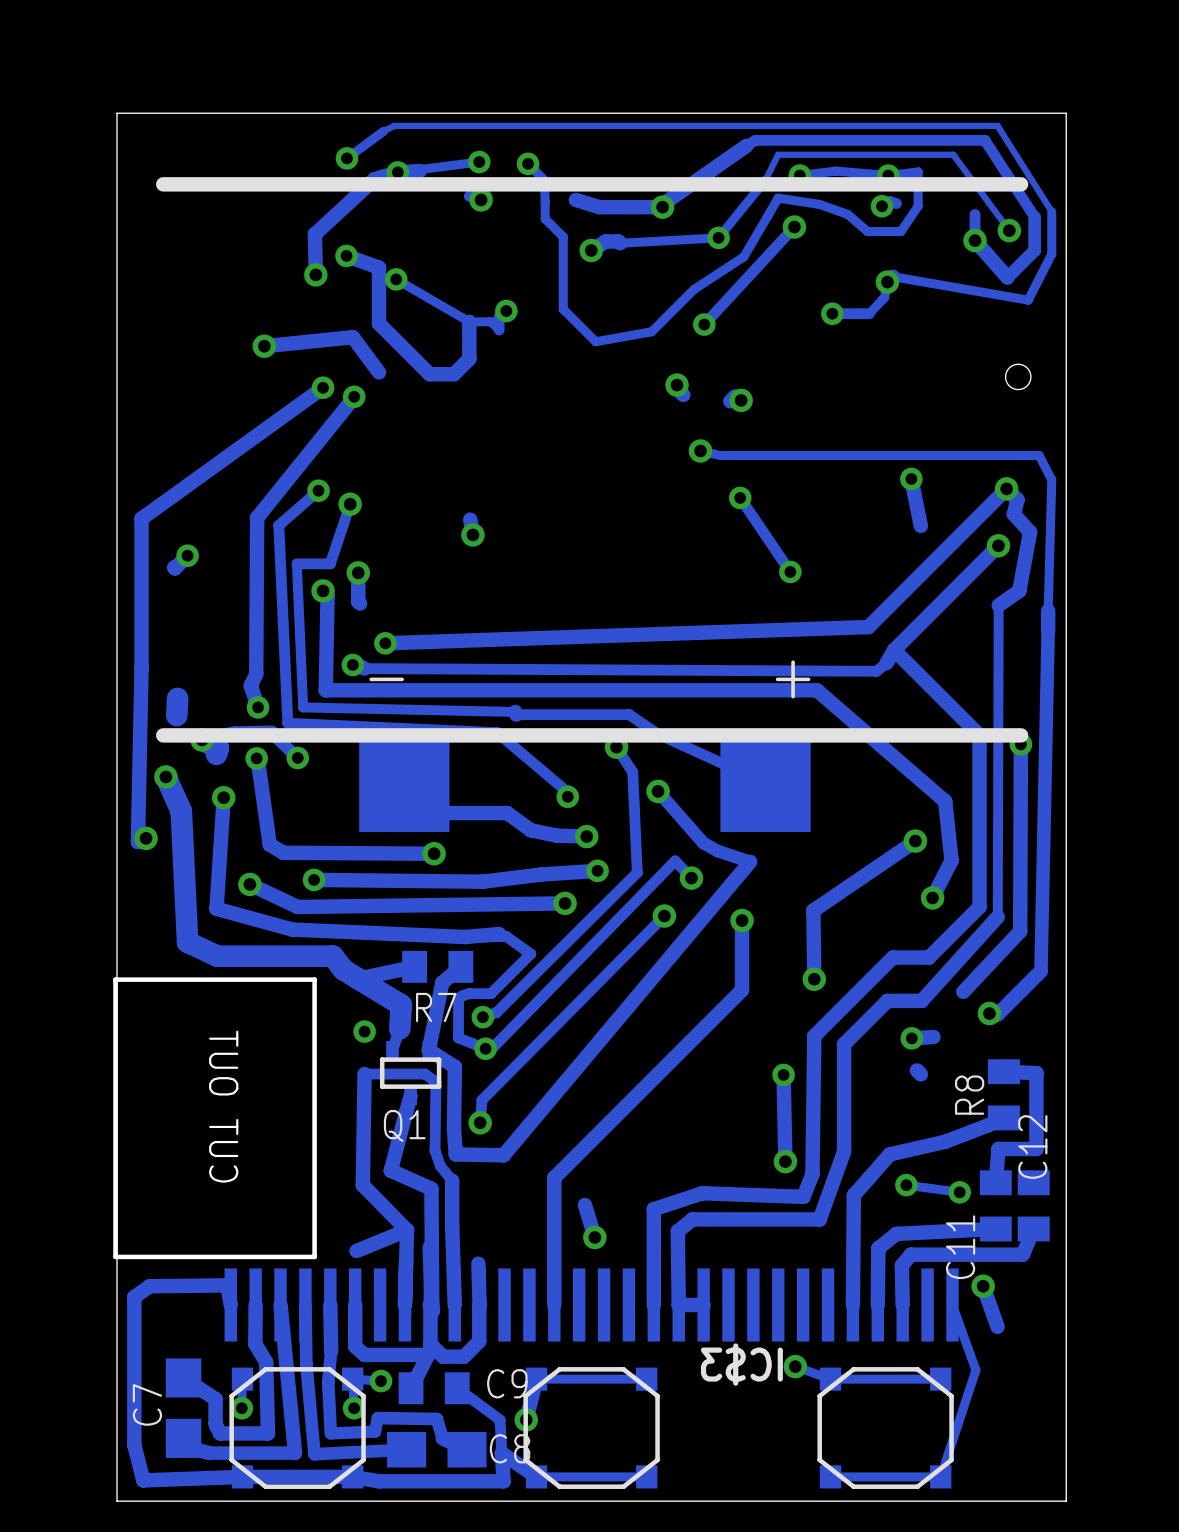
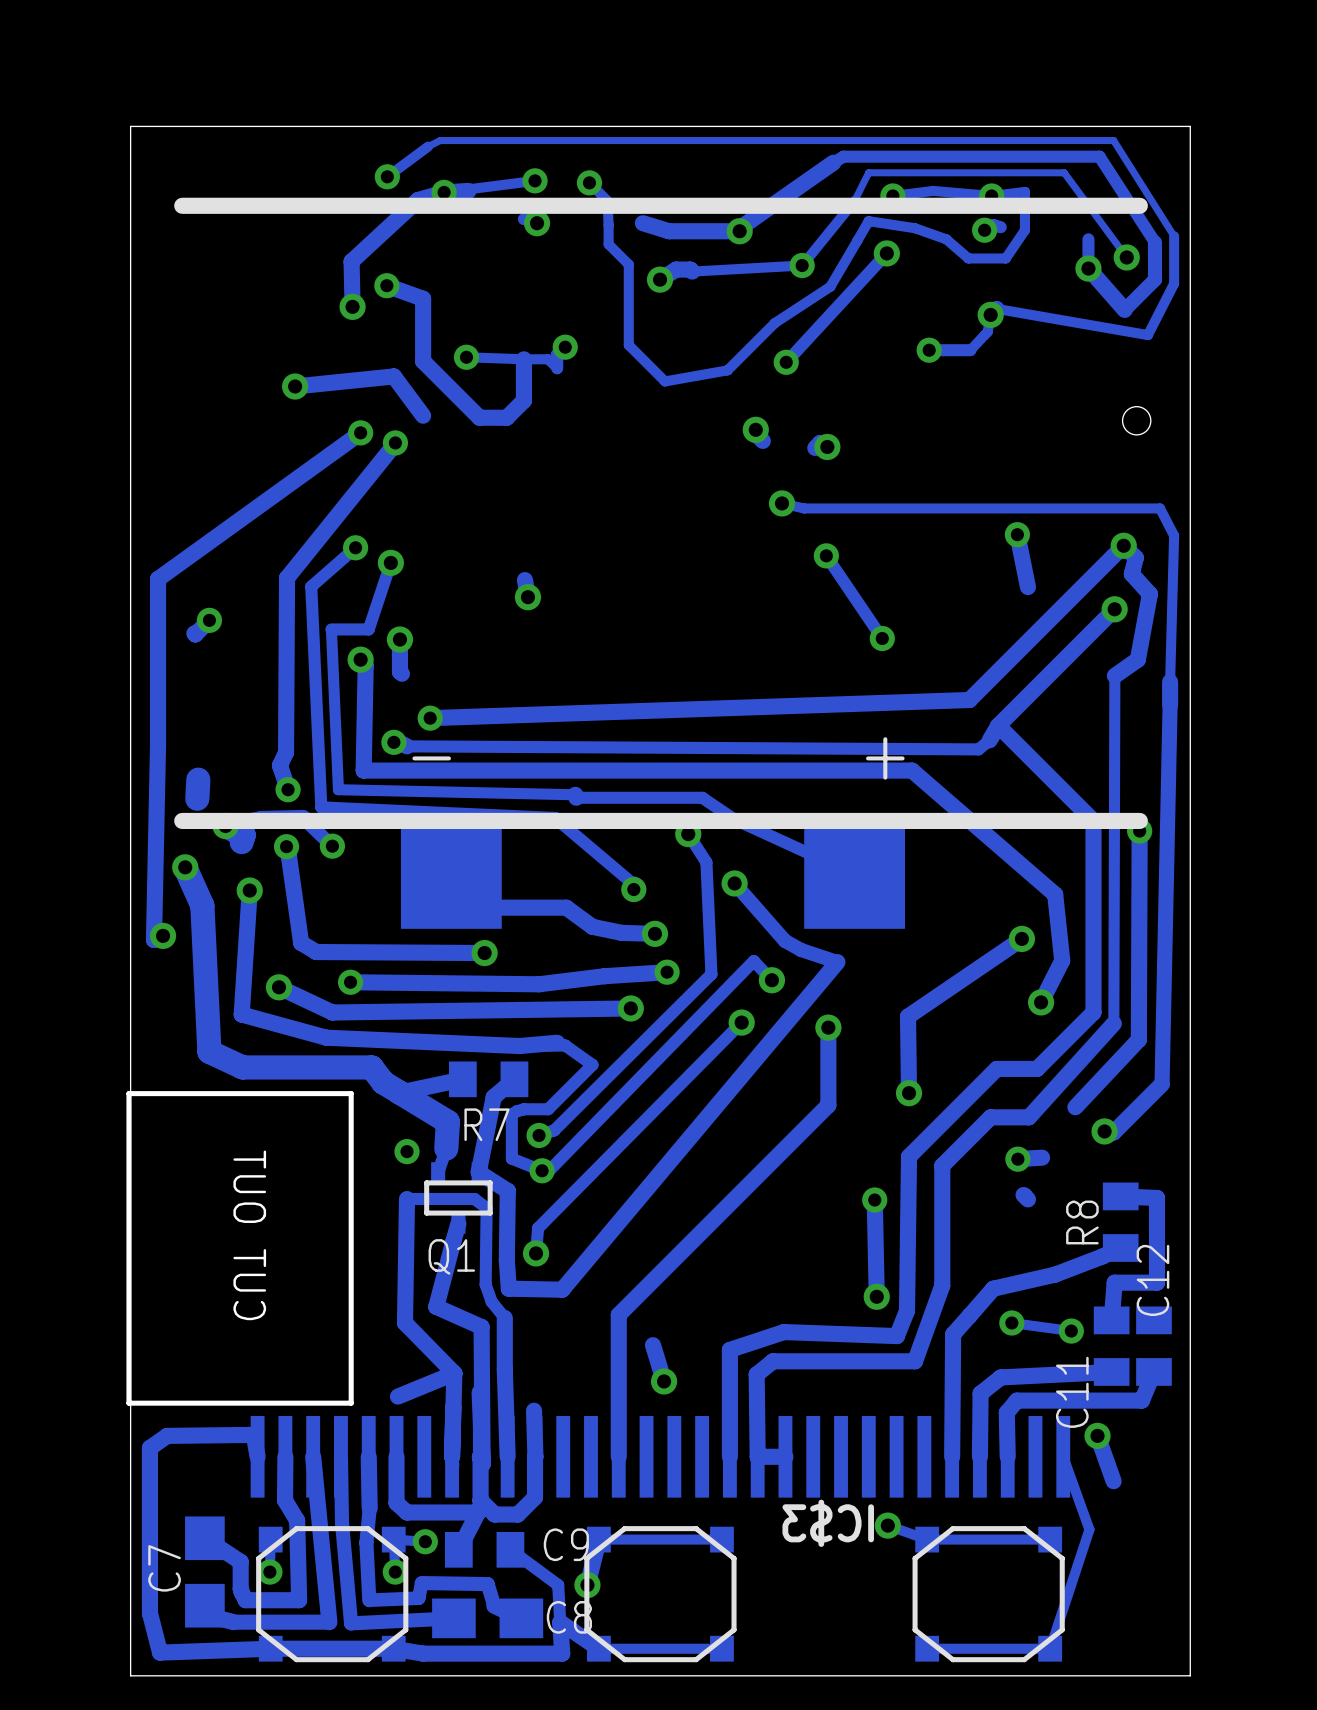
track: (396, 279) (469, 321) -> (466, 357) (523, 359)
via position: (396, 279) -> (466, 357)

